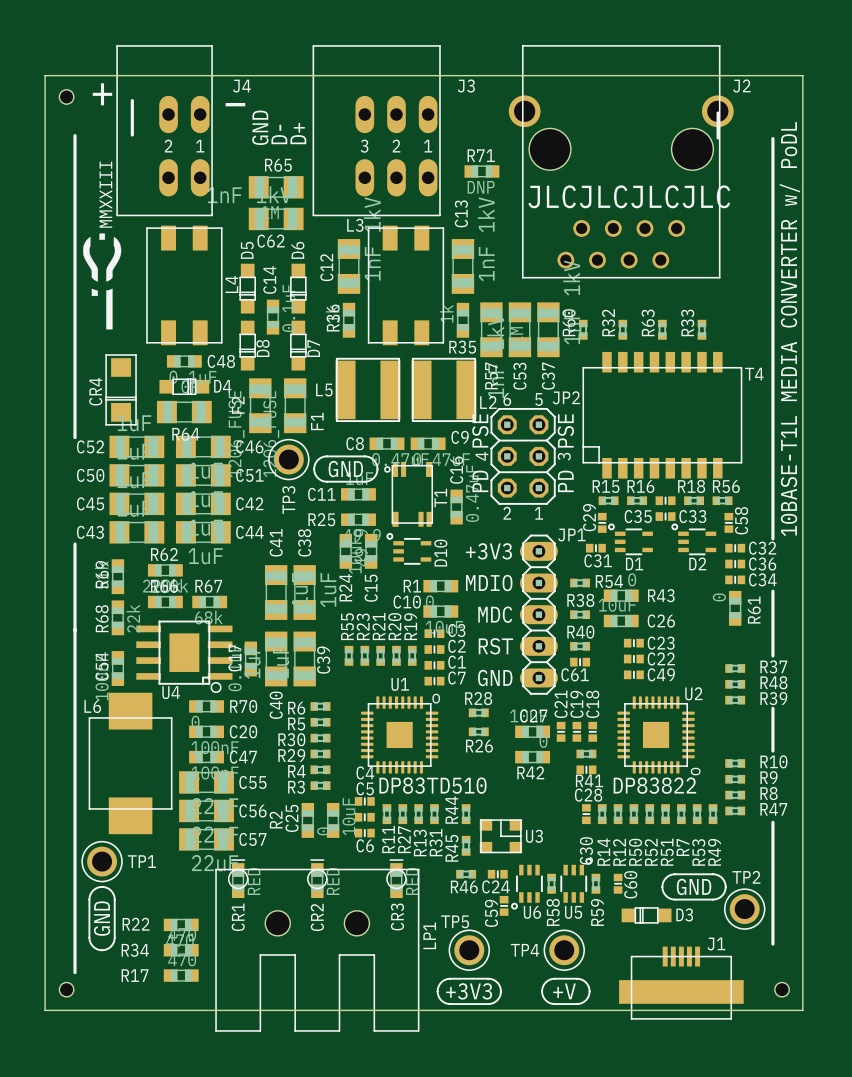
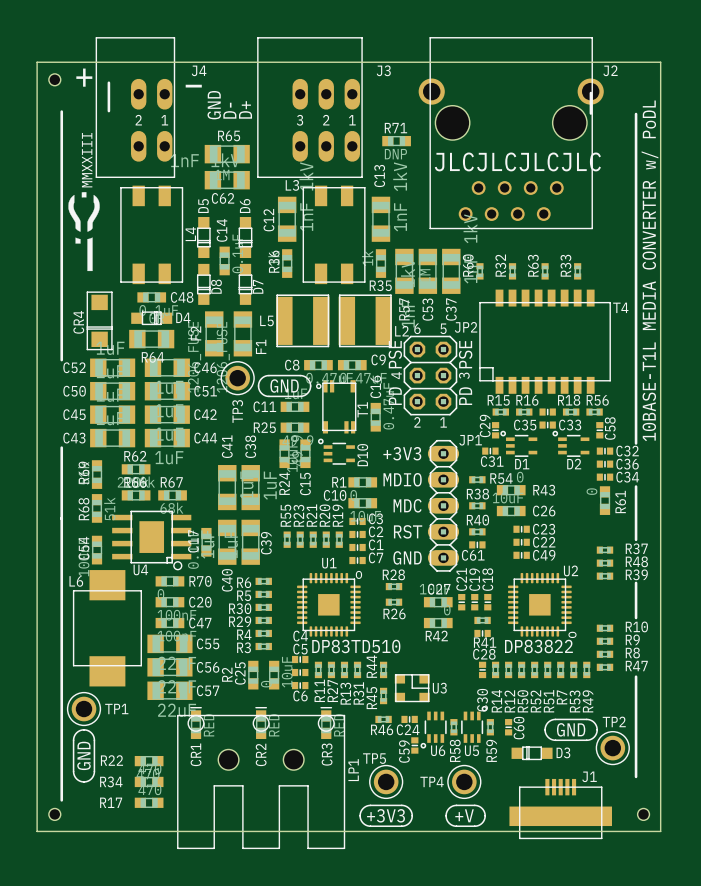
R68 value: 22k (133, 618) -> 51k (109, 509)

